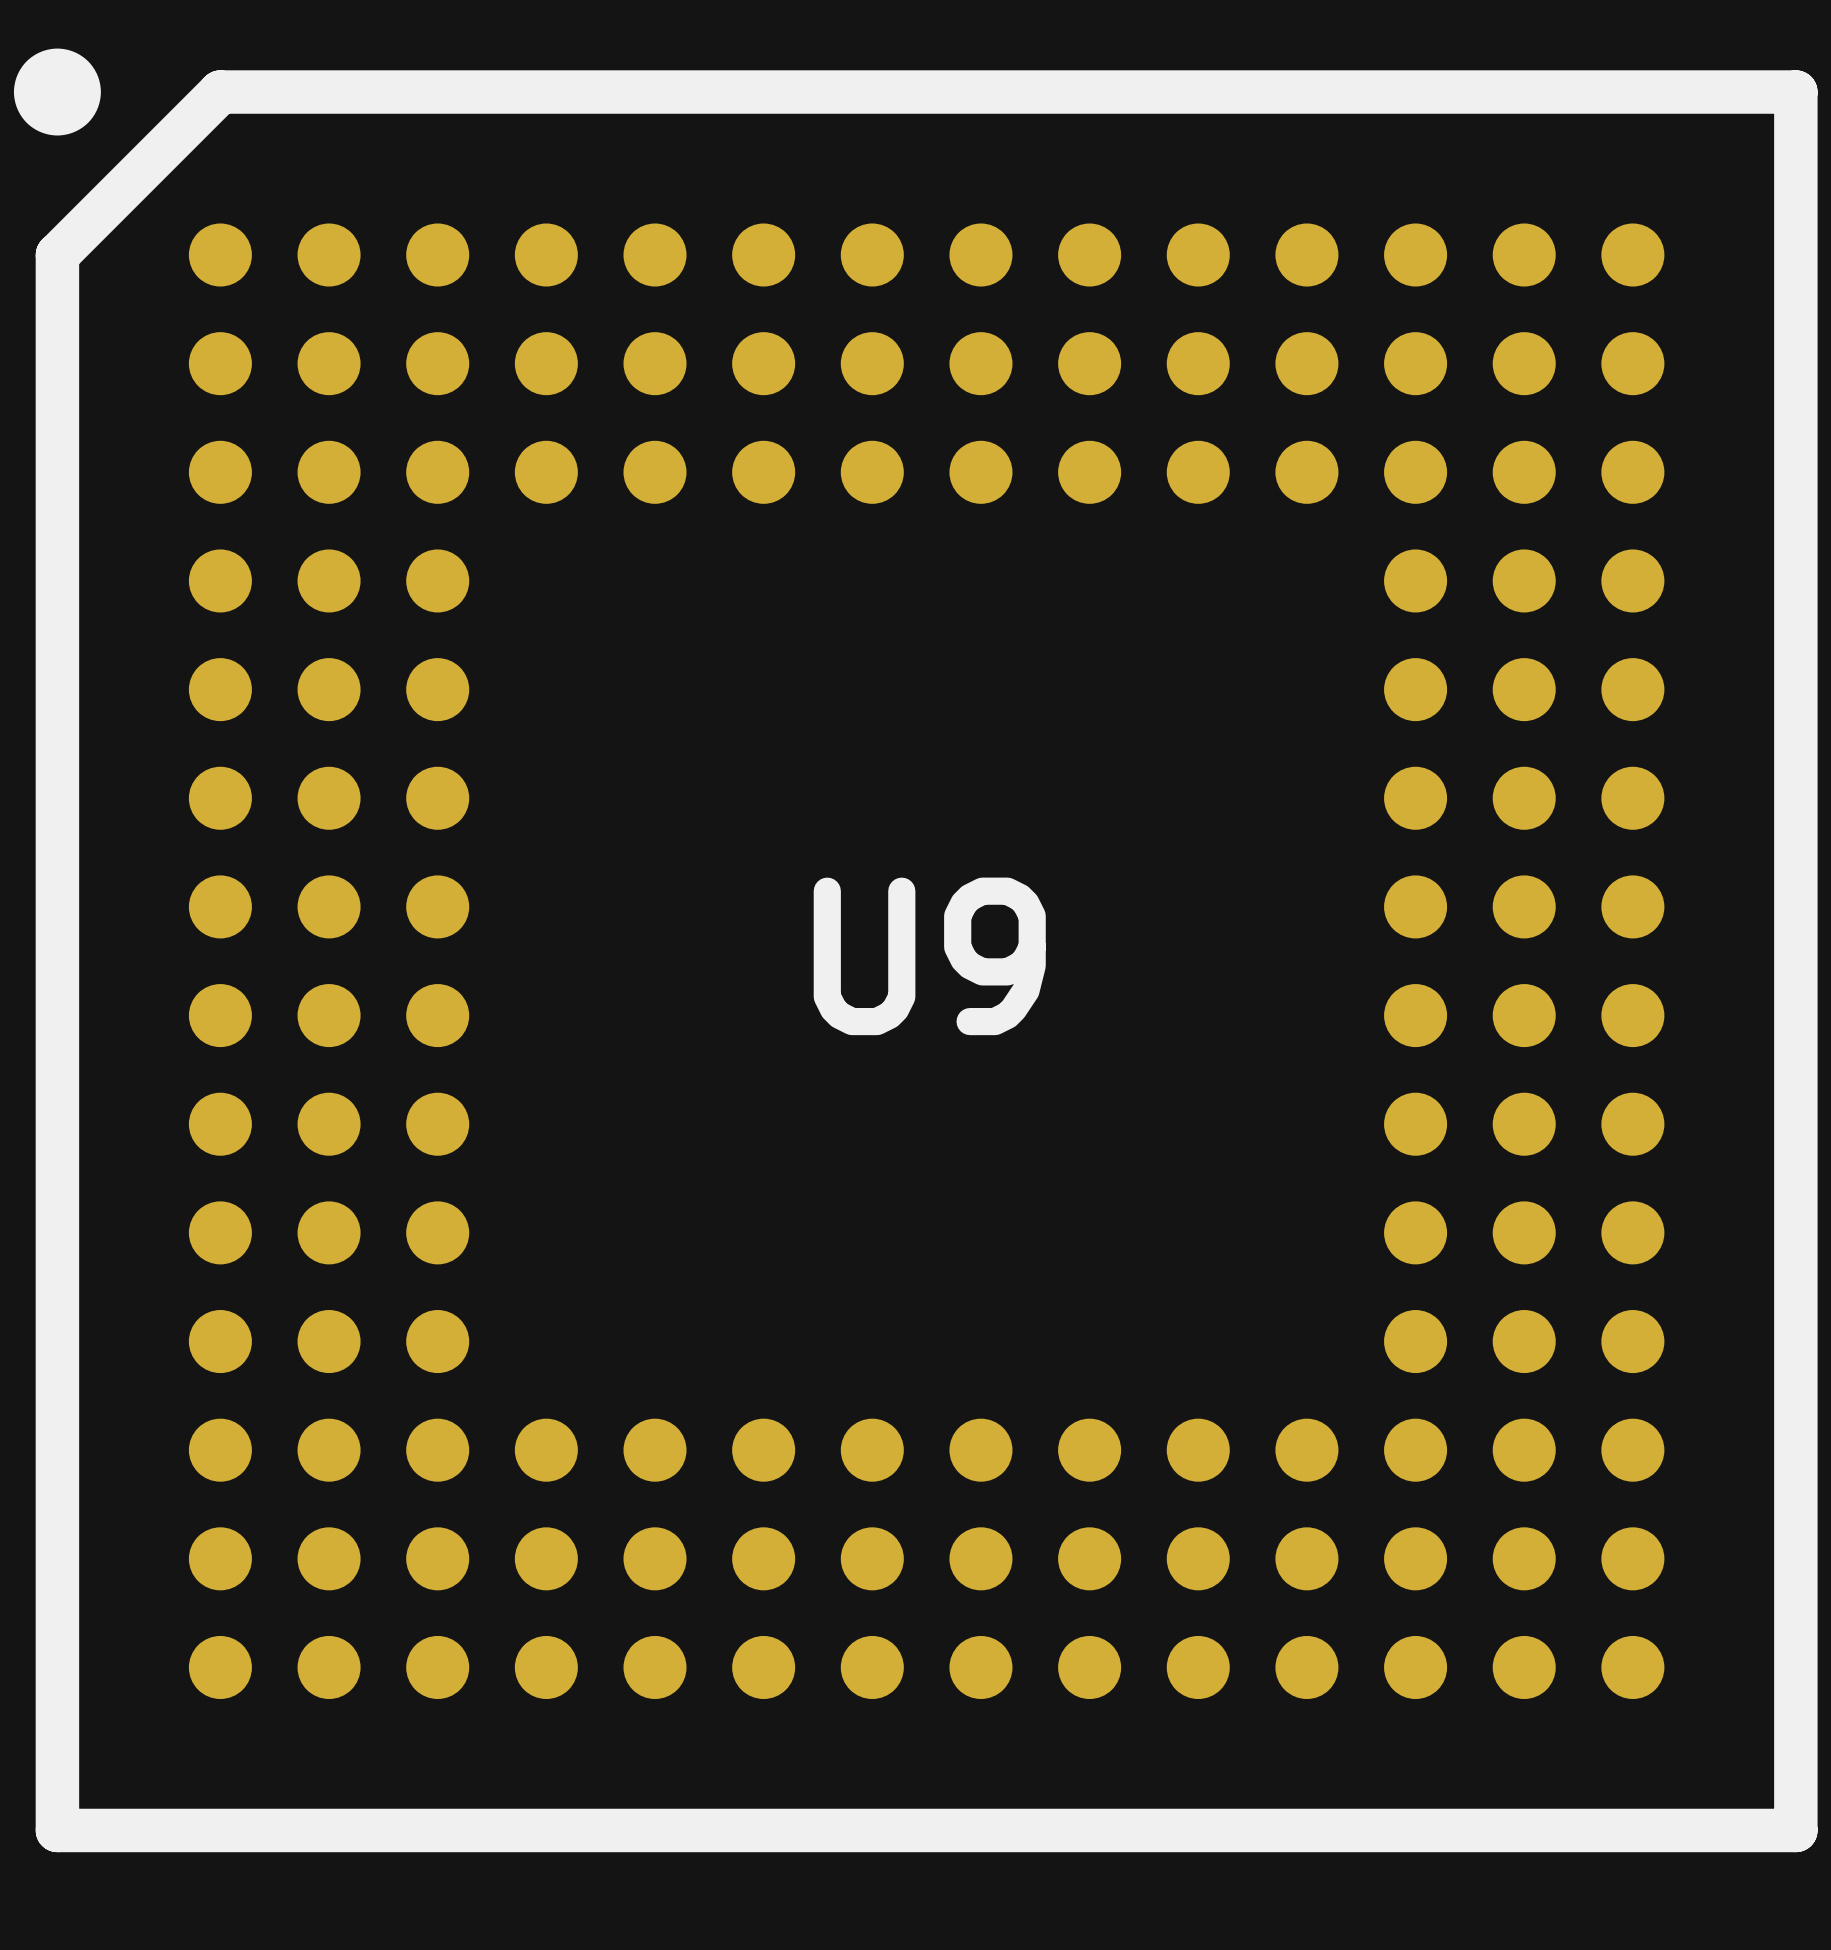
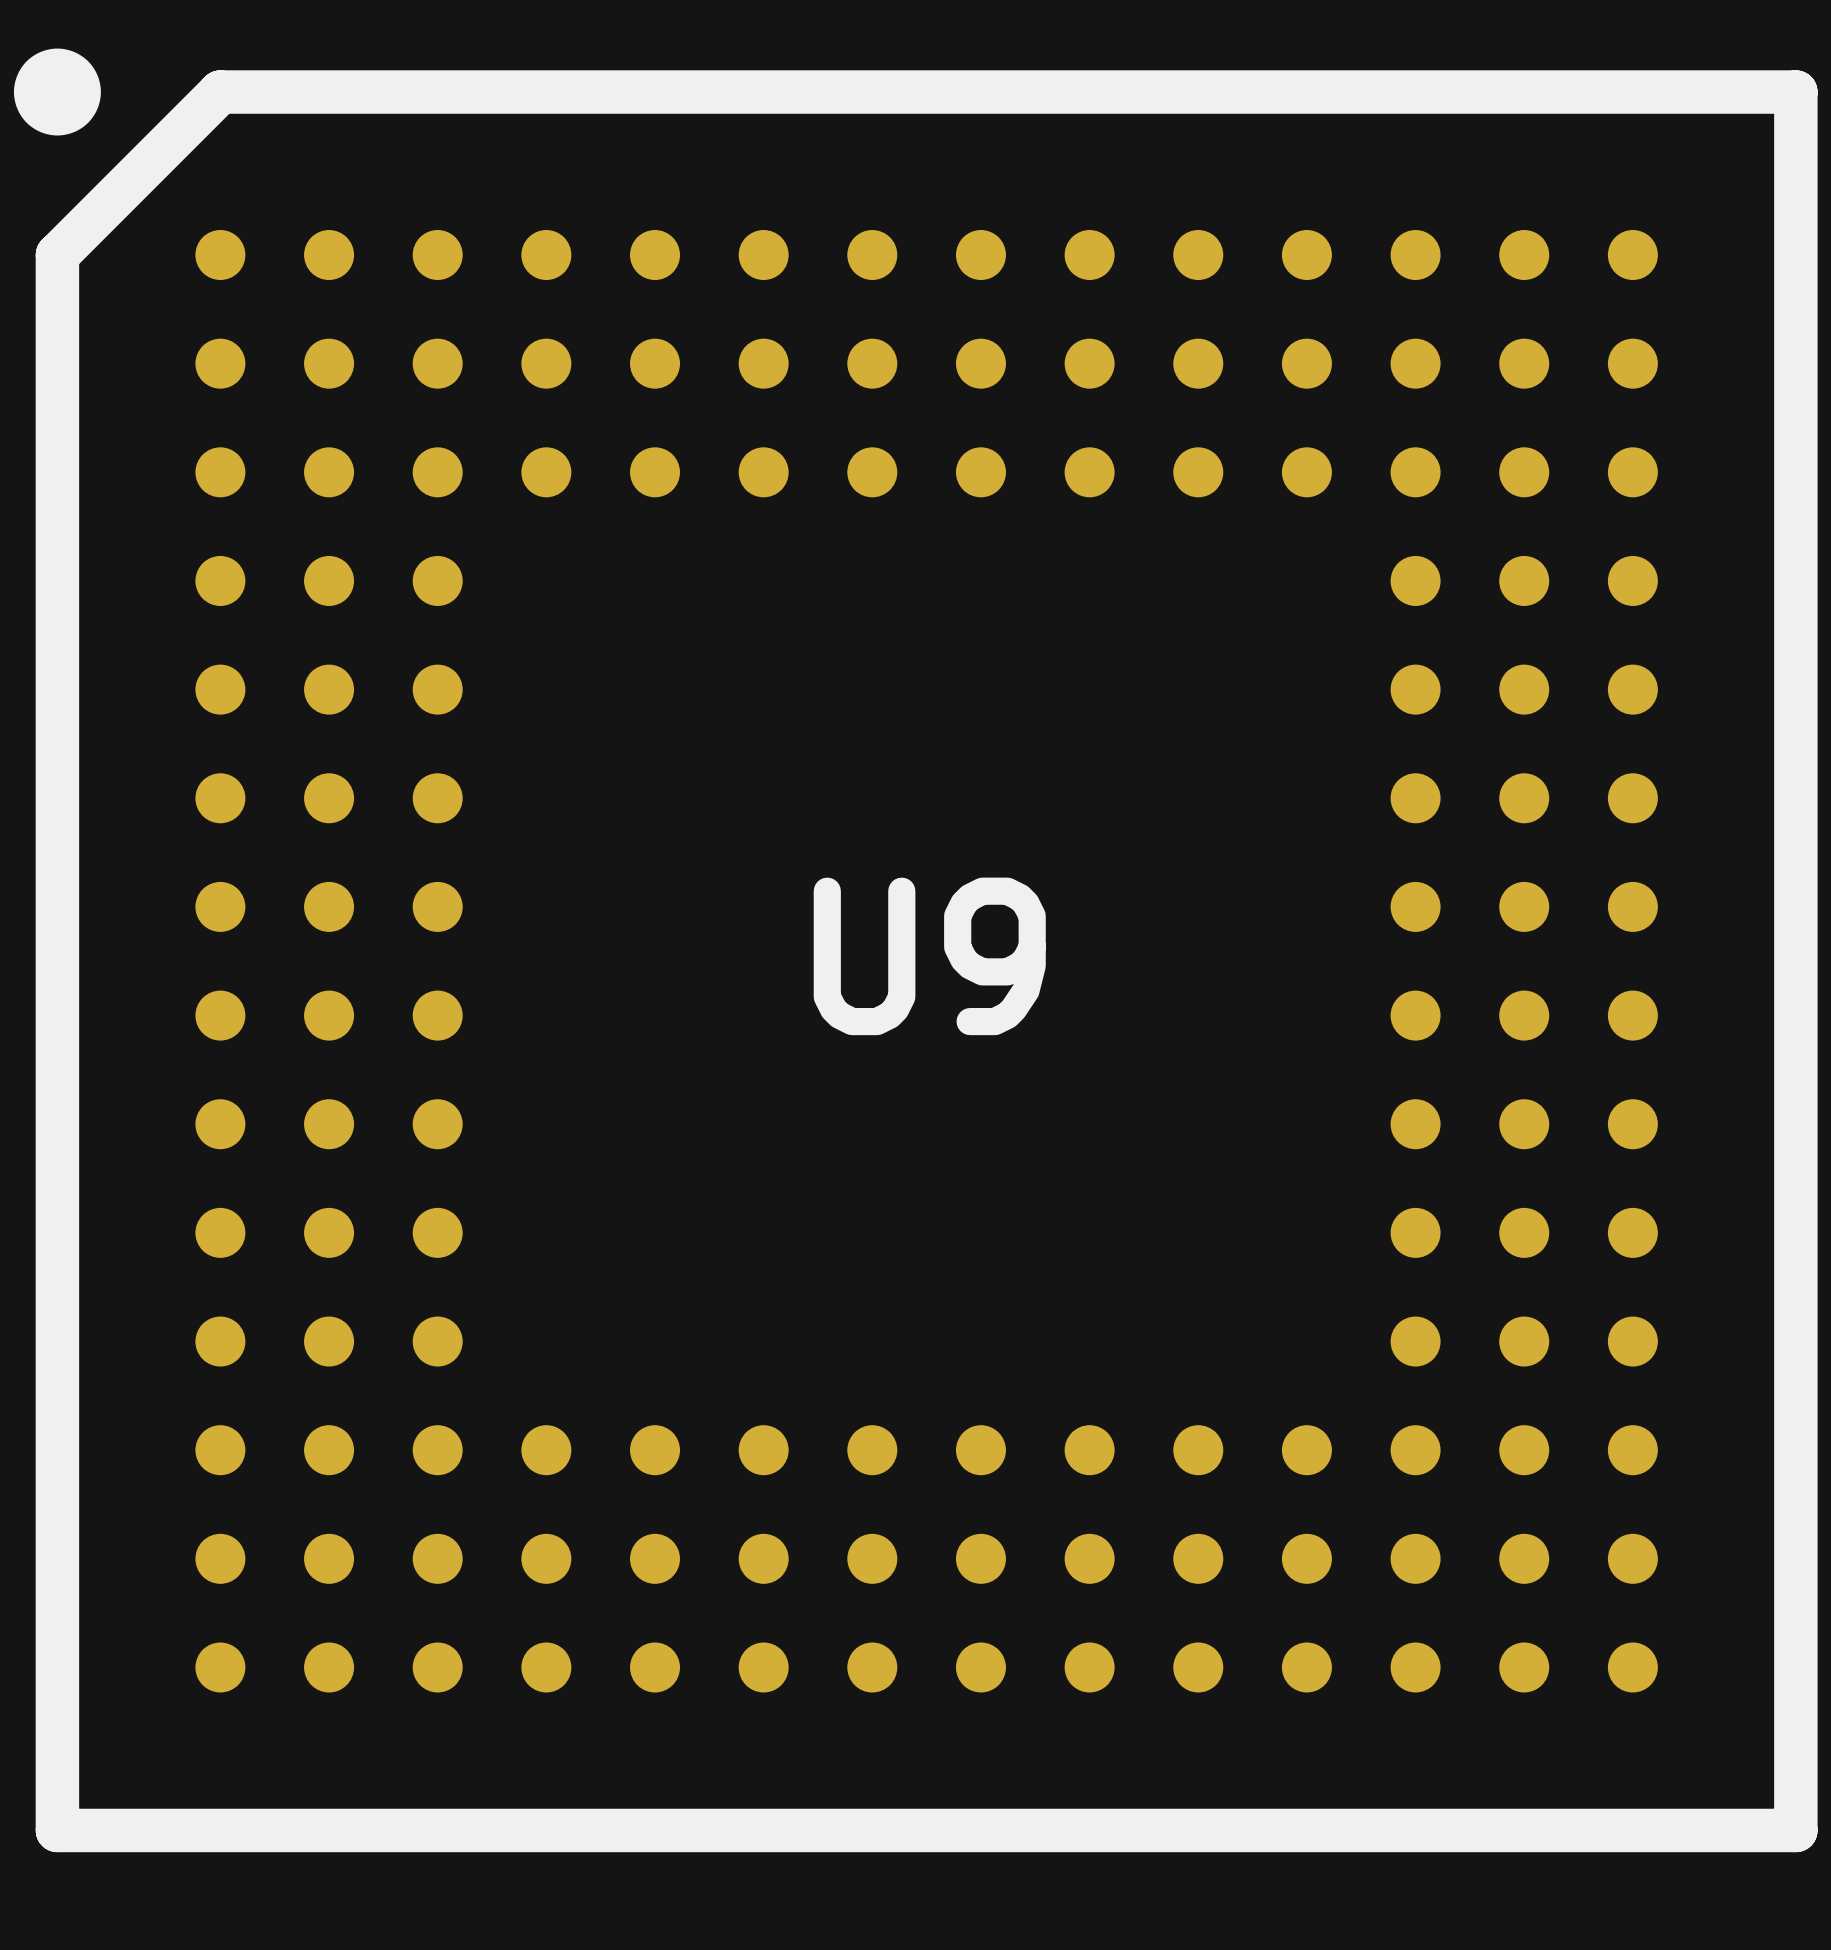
U9 footprint: [13, 48, 1818, 1853] -> [13, 48, 1818, 1853]

